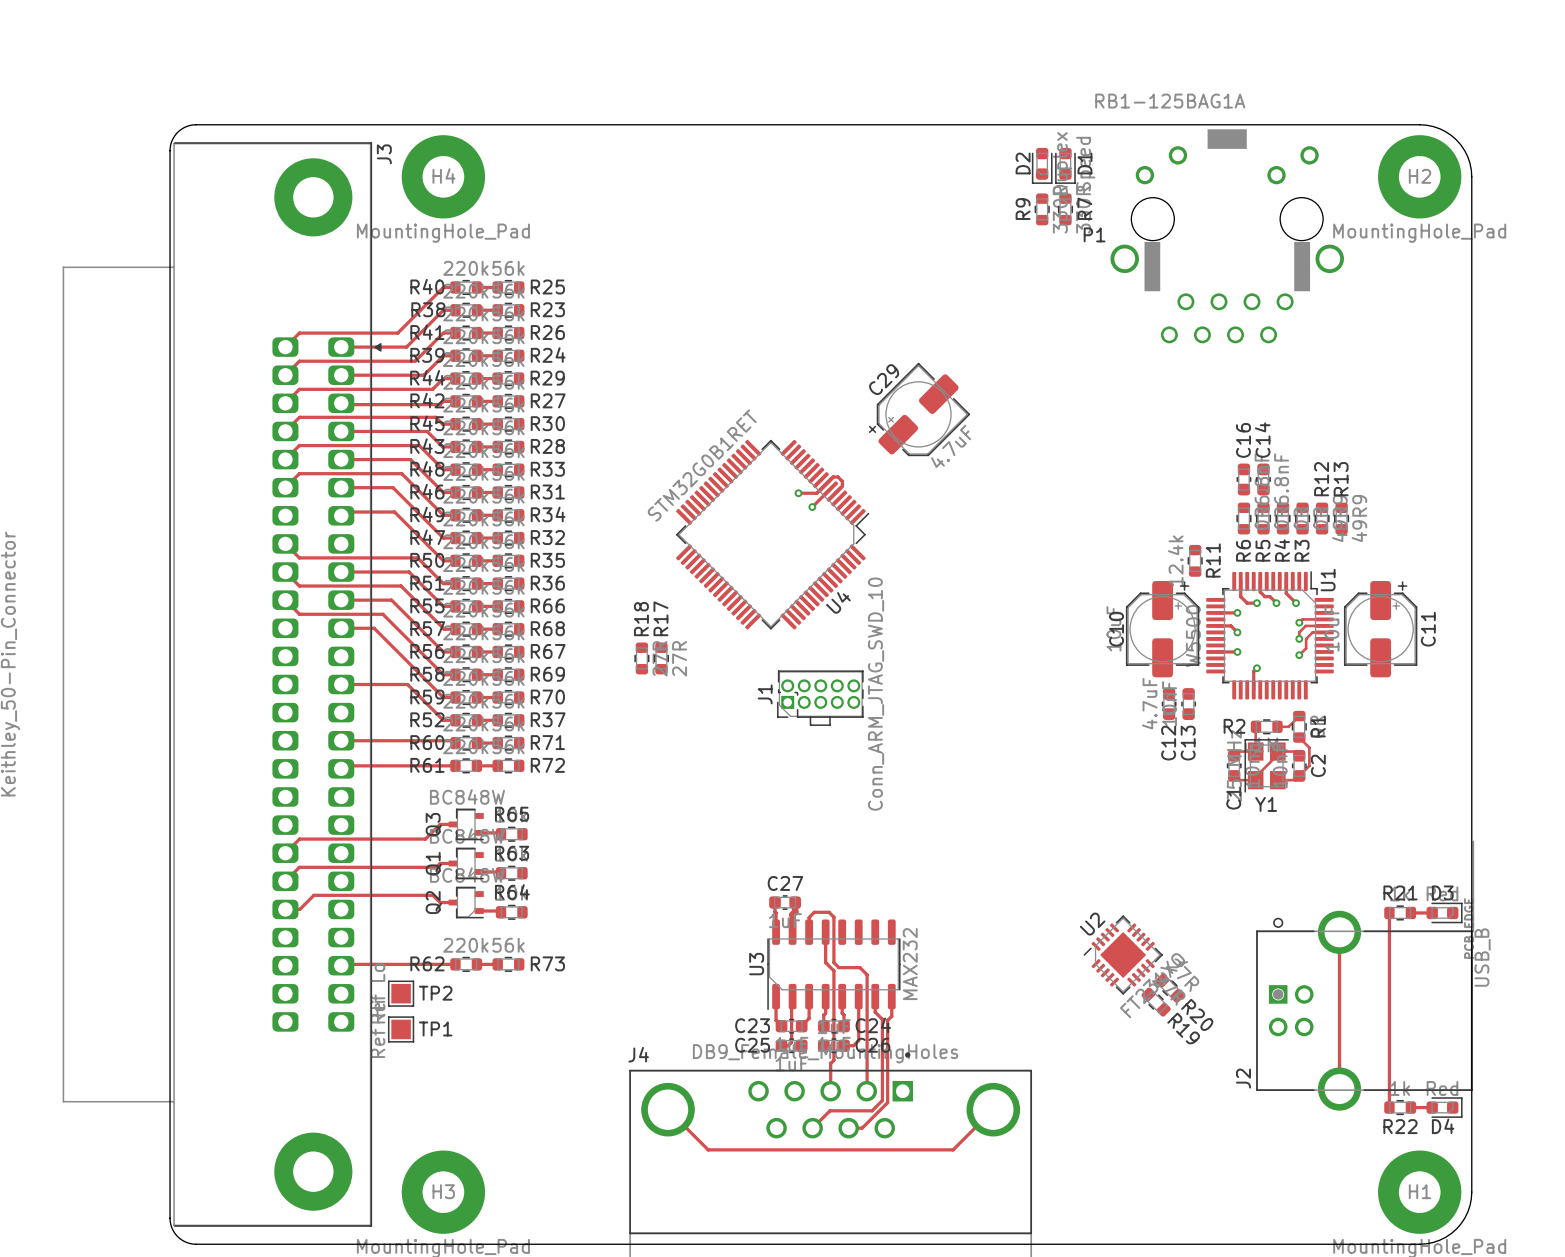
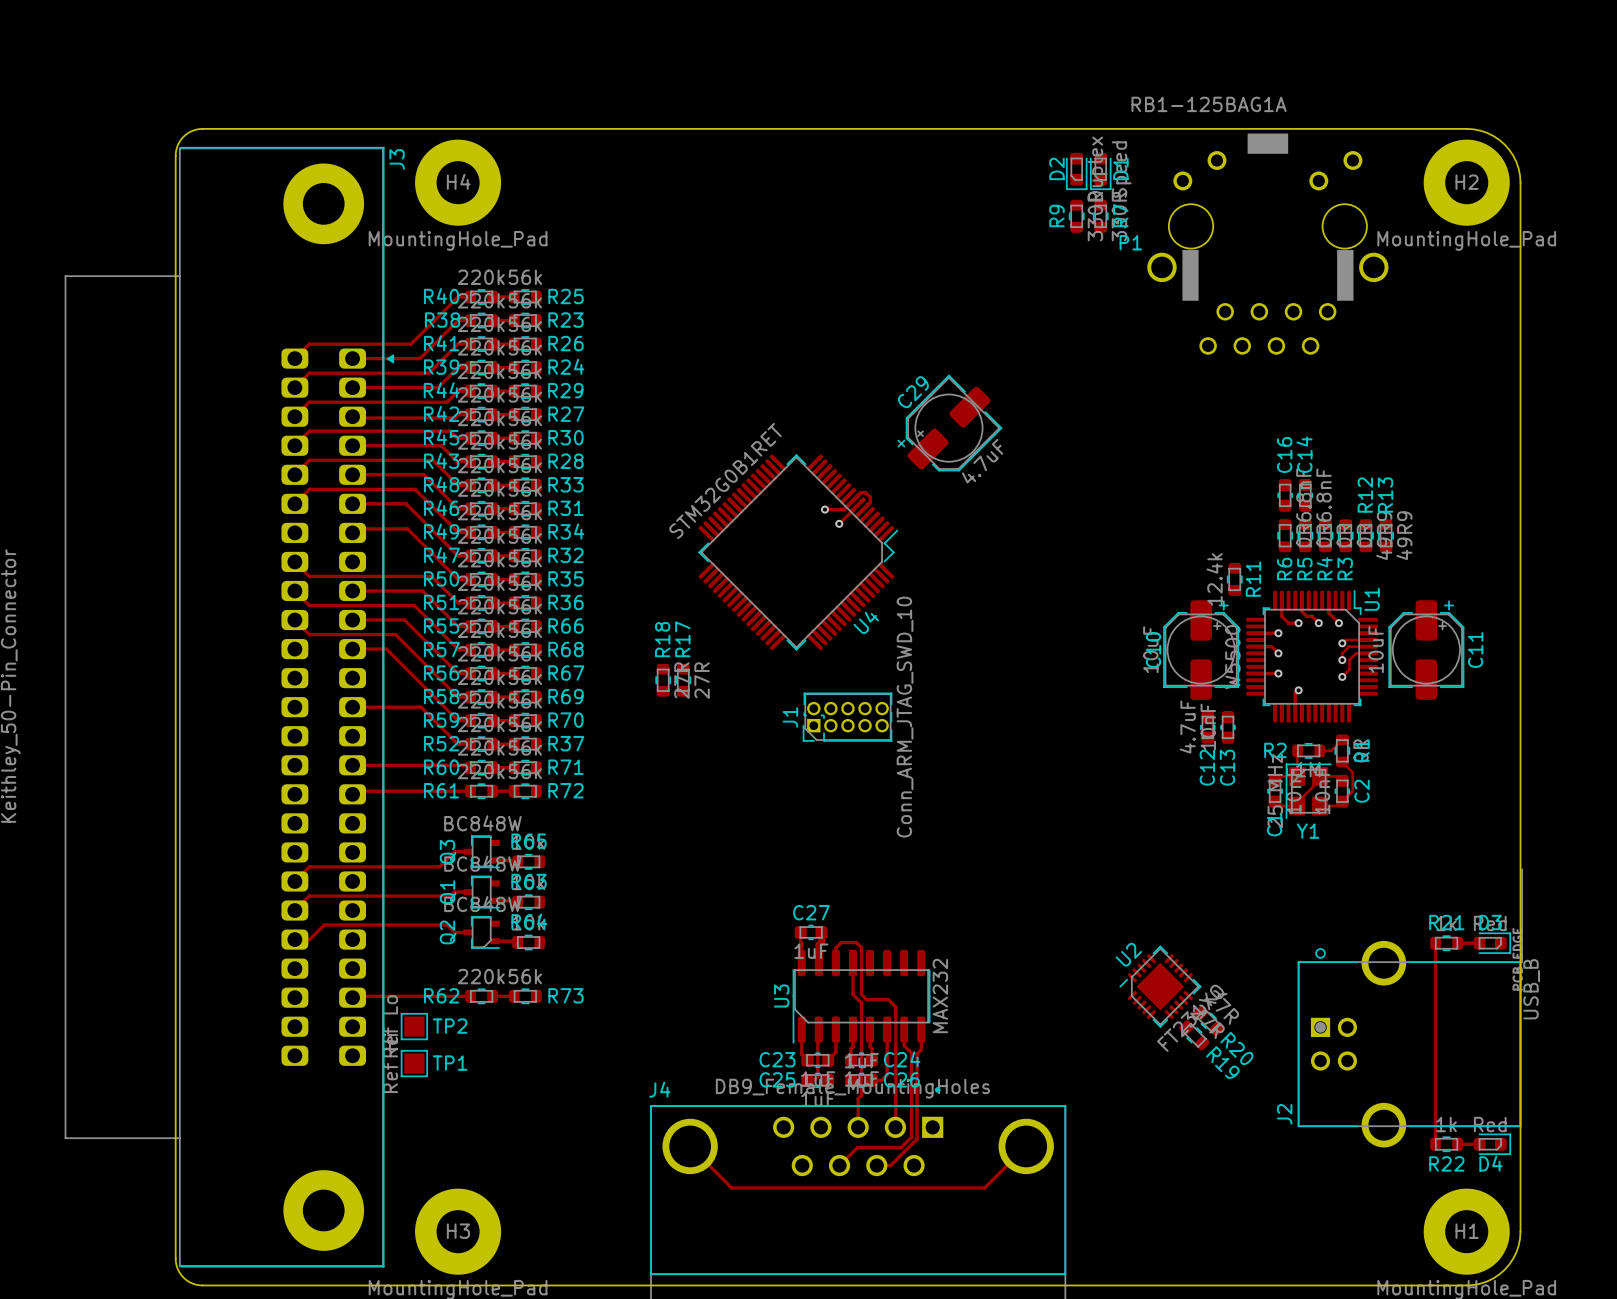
J1 footprint: [777, 670, 864, 726] -> [802, 692, 893, 742]
track: (1339, 932) (1339, 1089) -> none

